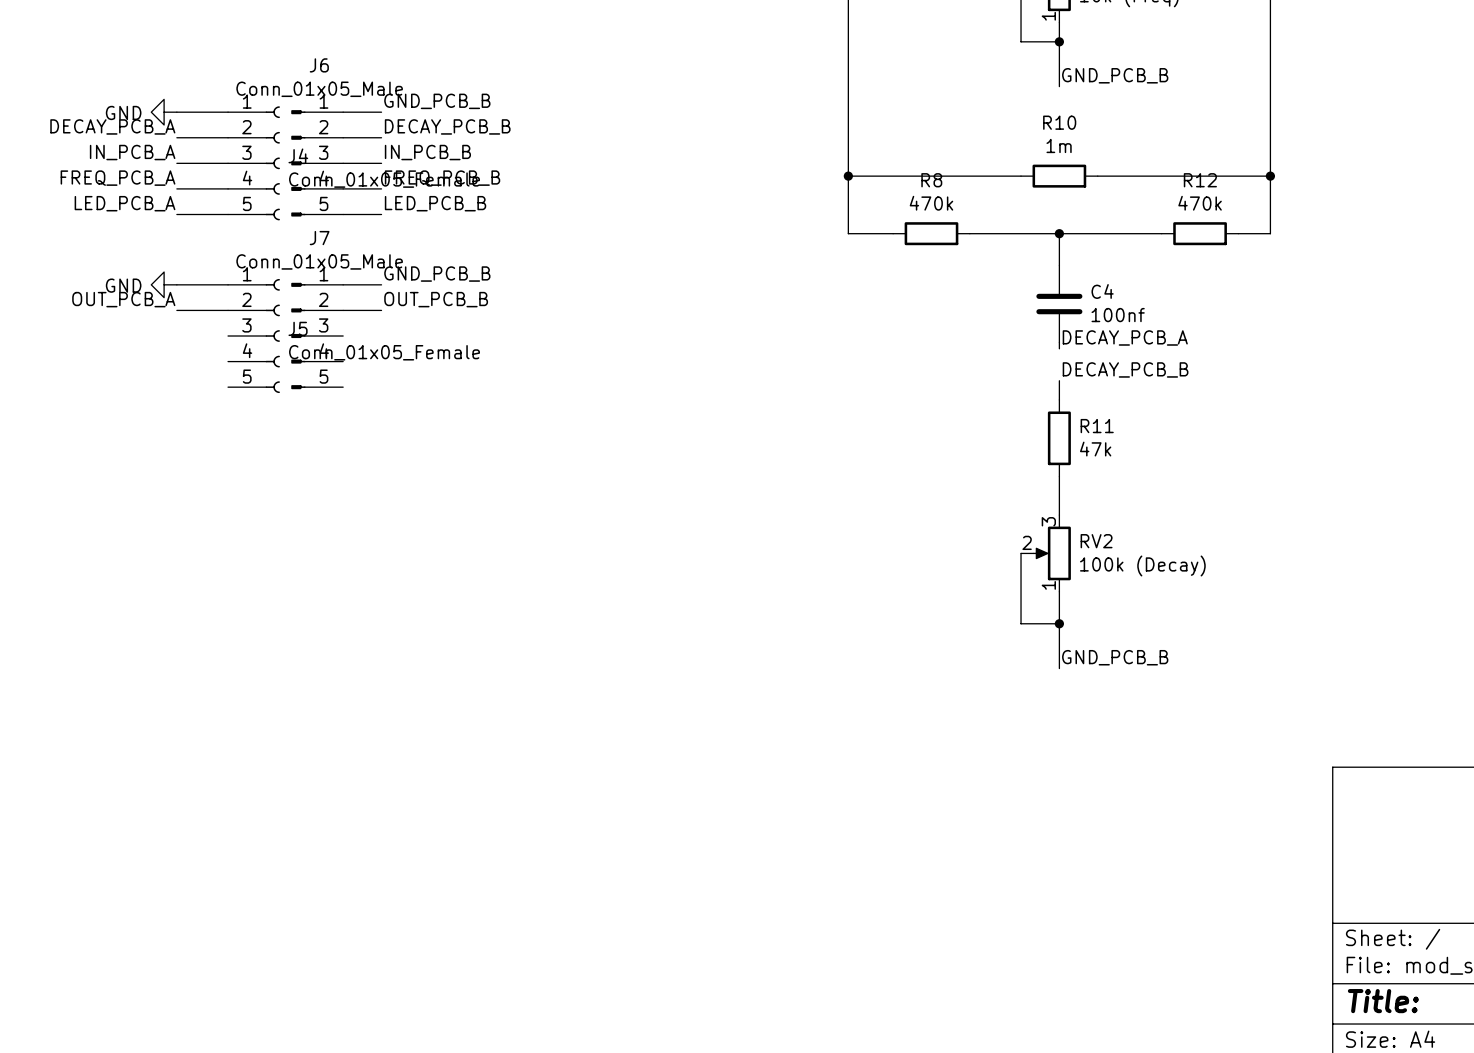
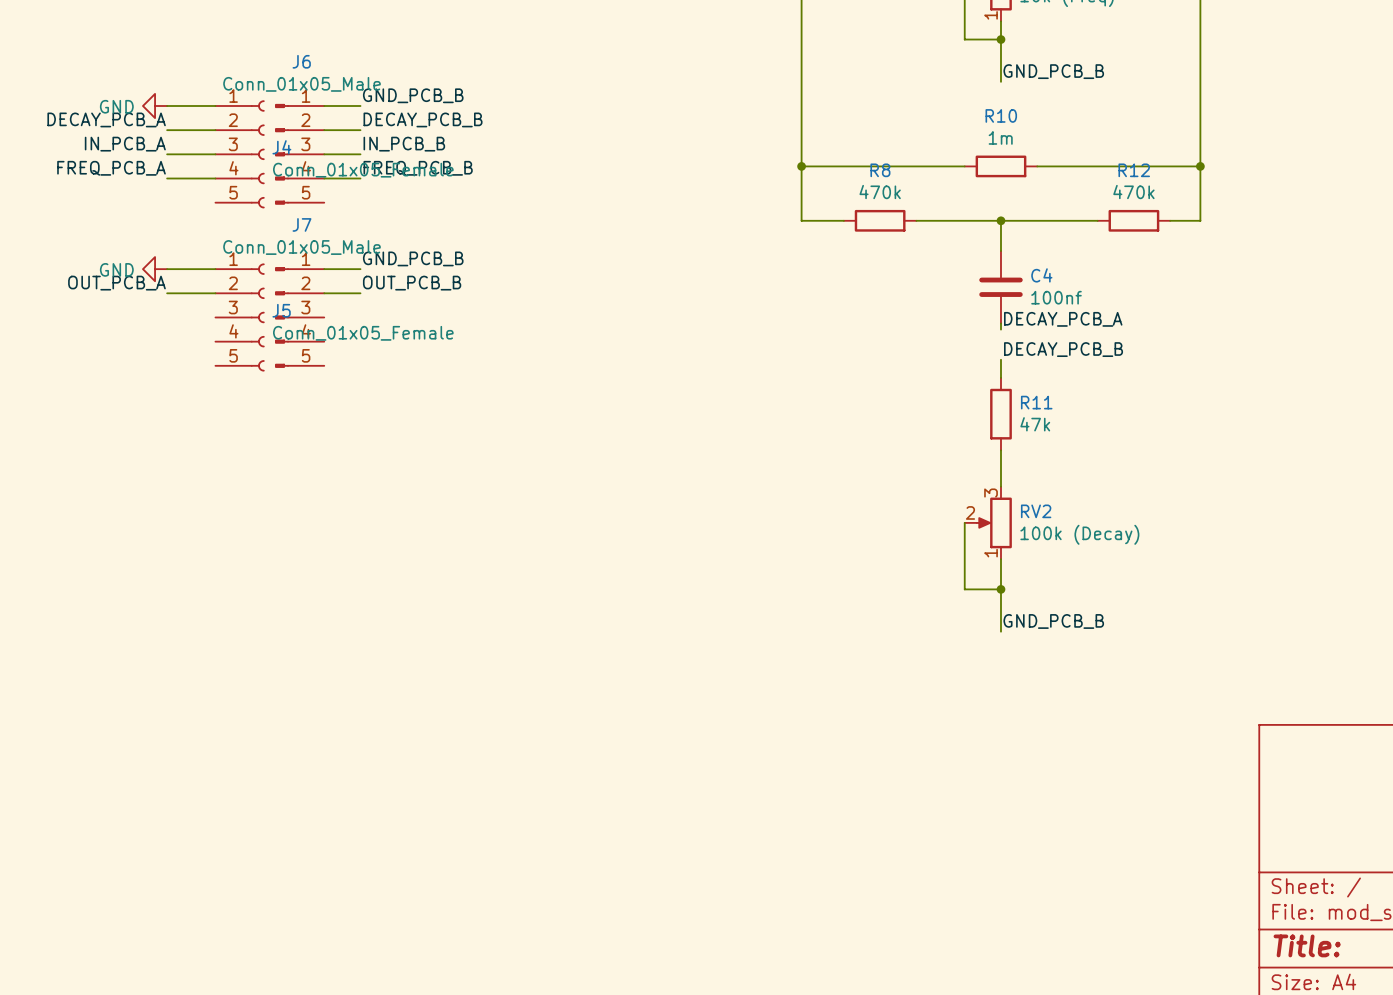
label: LED_PCB_A (125, 203) -> none
label: LED_PCB_B (435, 203) -> none
wire: (176, 214) (228, 214) -> none
wire: (343, 214) (381, 214) -> none

